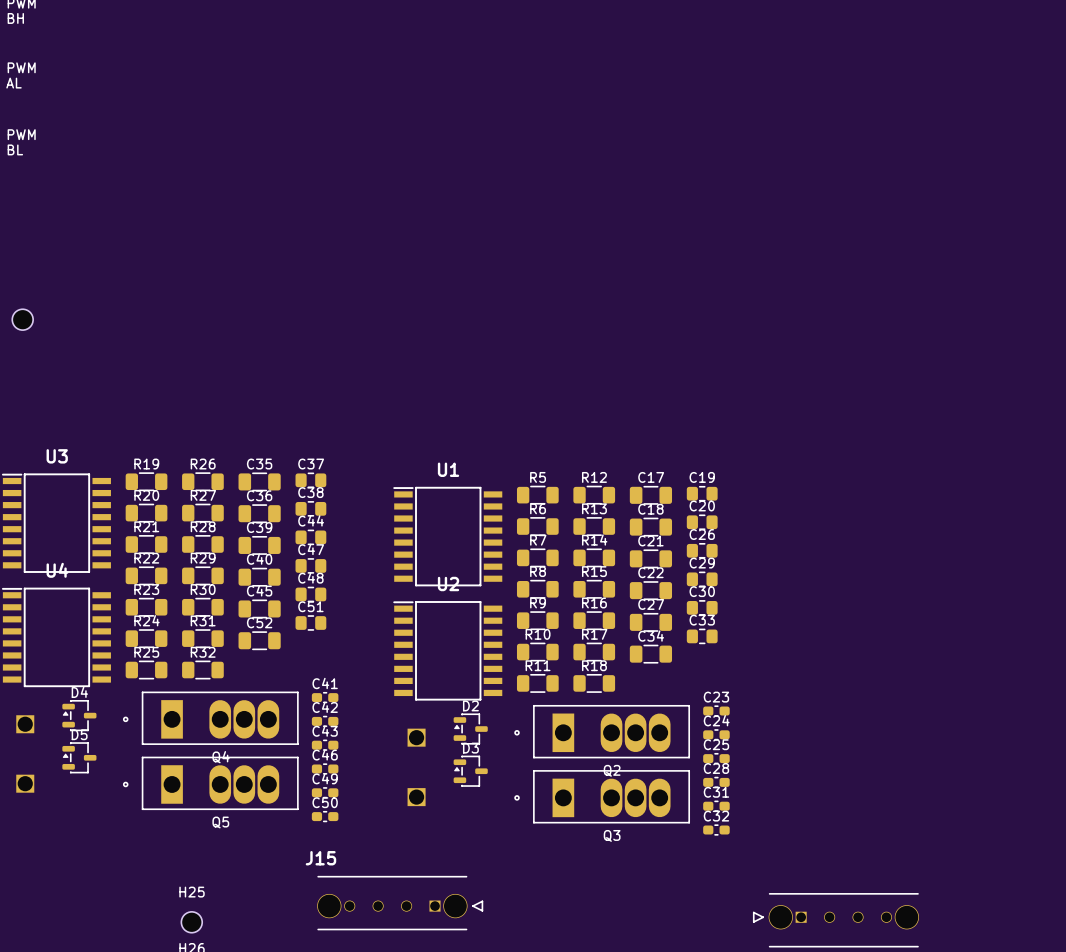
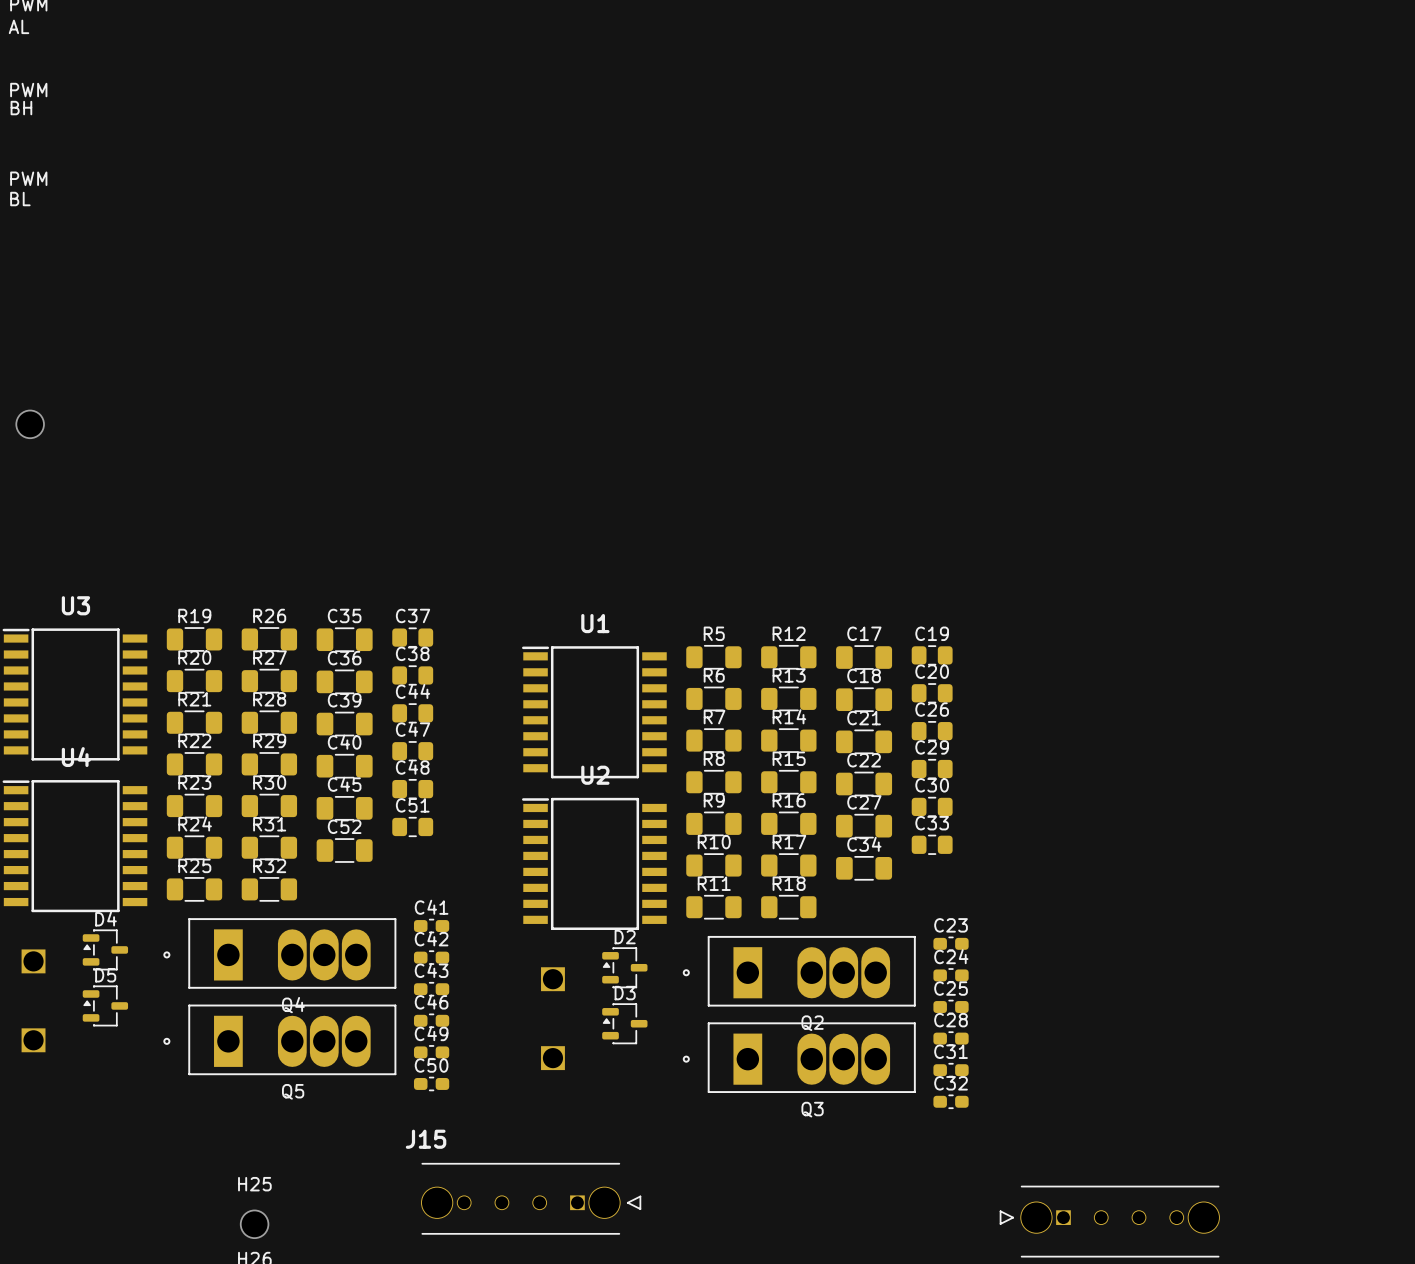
text: BH (15, 18) -> AL (19, 26)
text: AL (14, 83) -> BH (21, 108)

